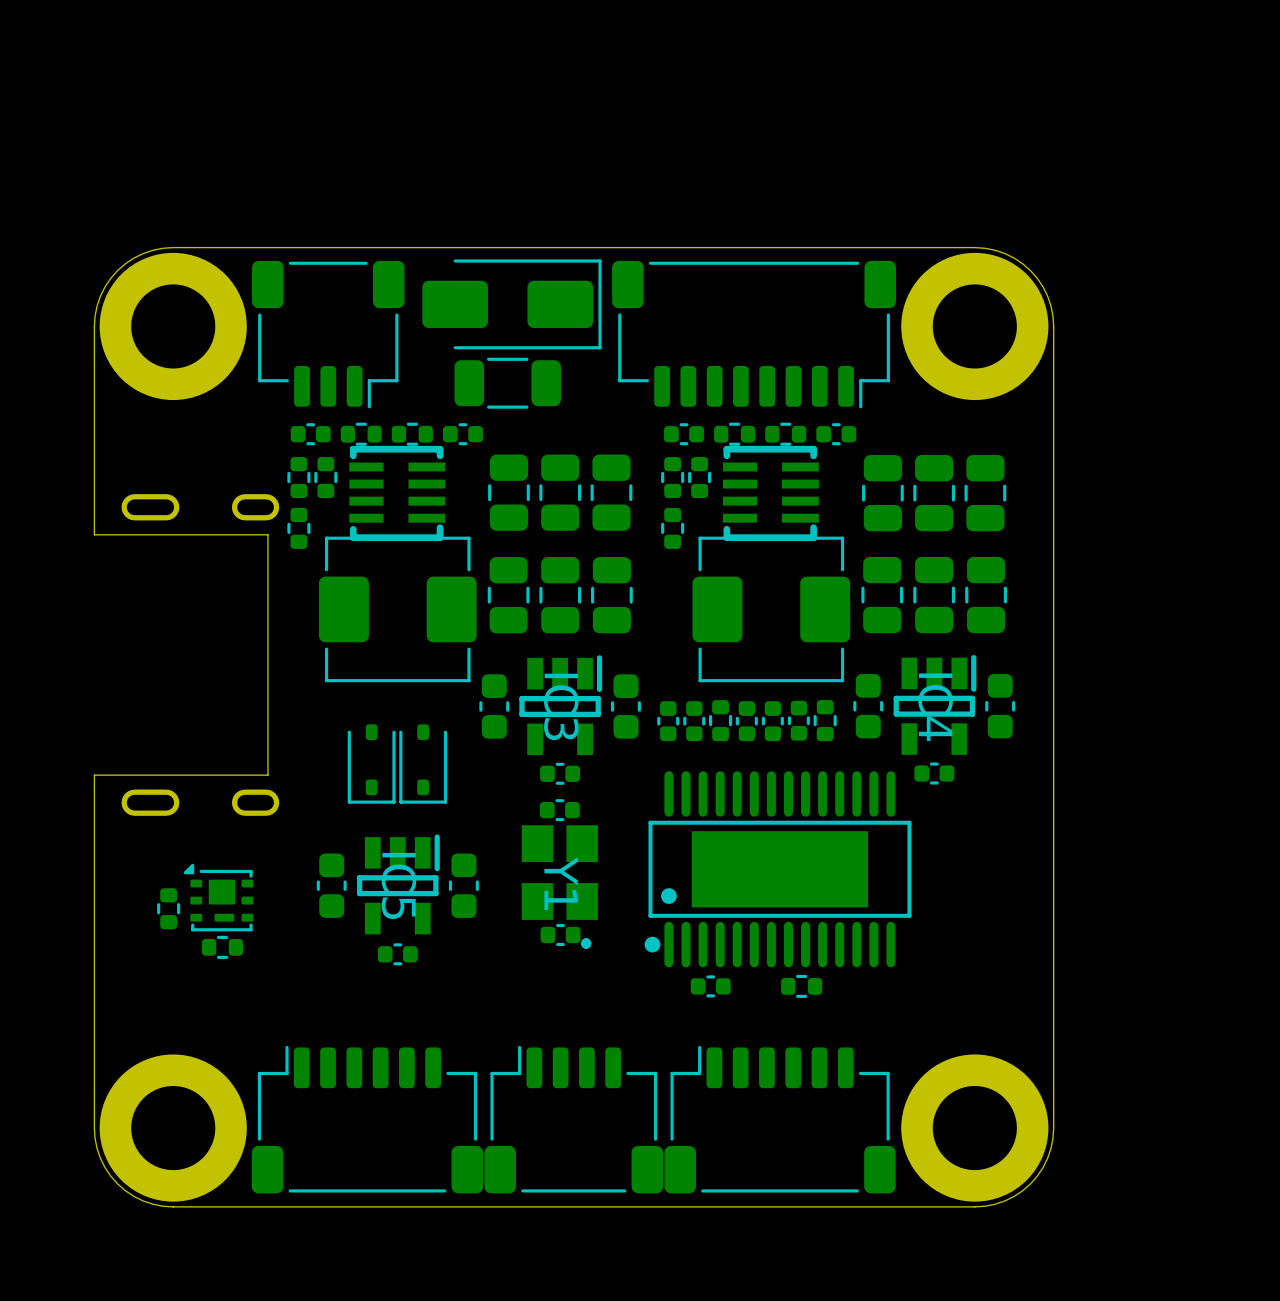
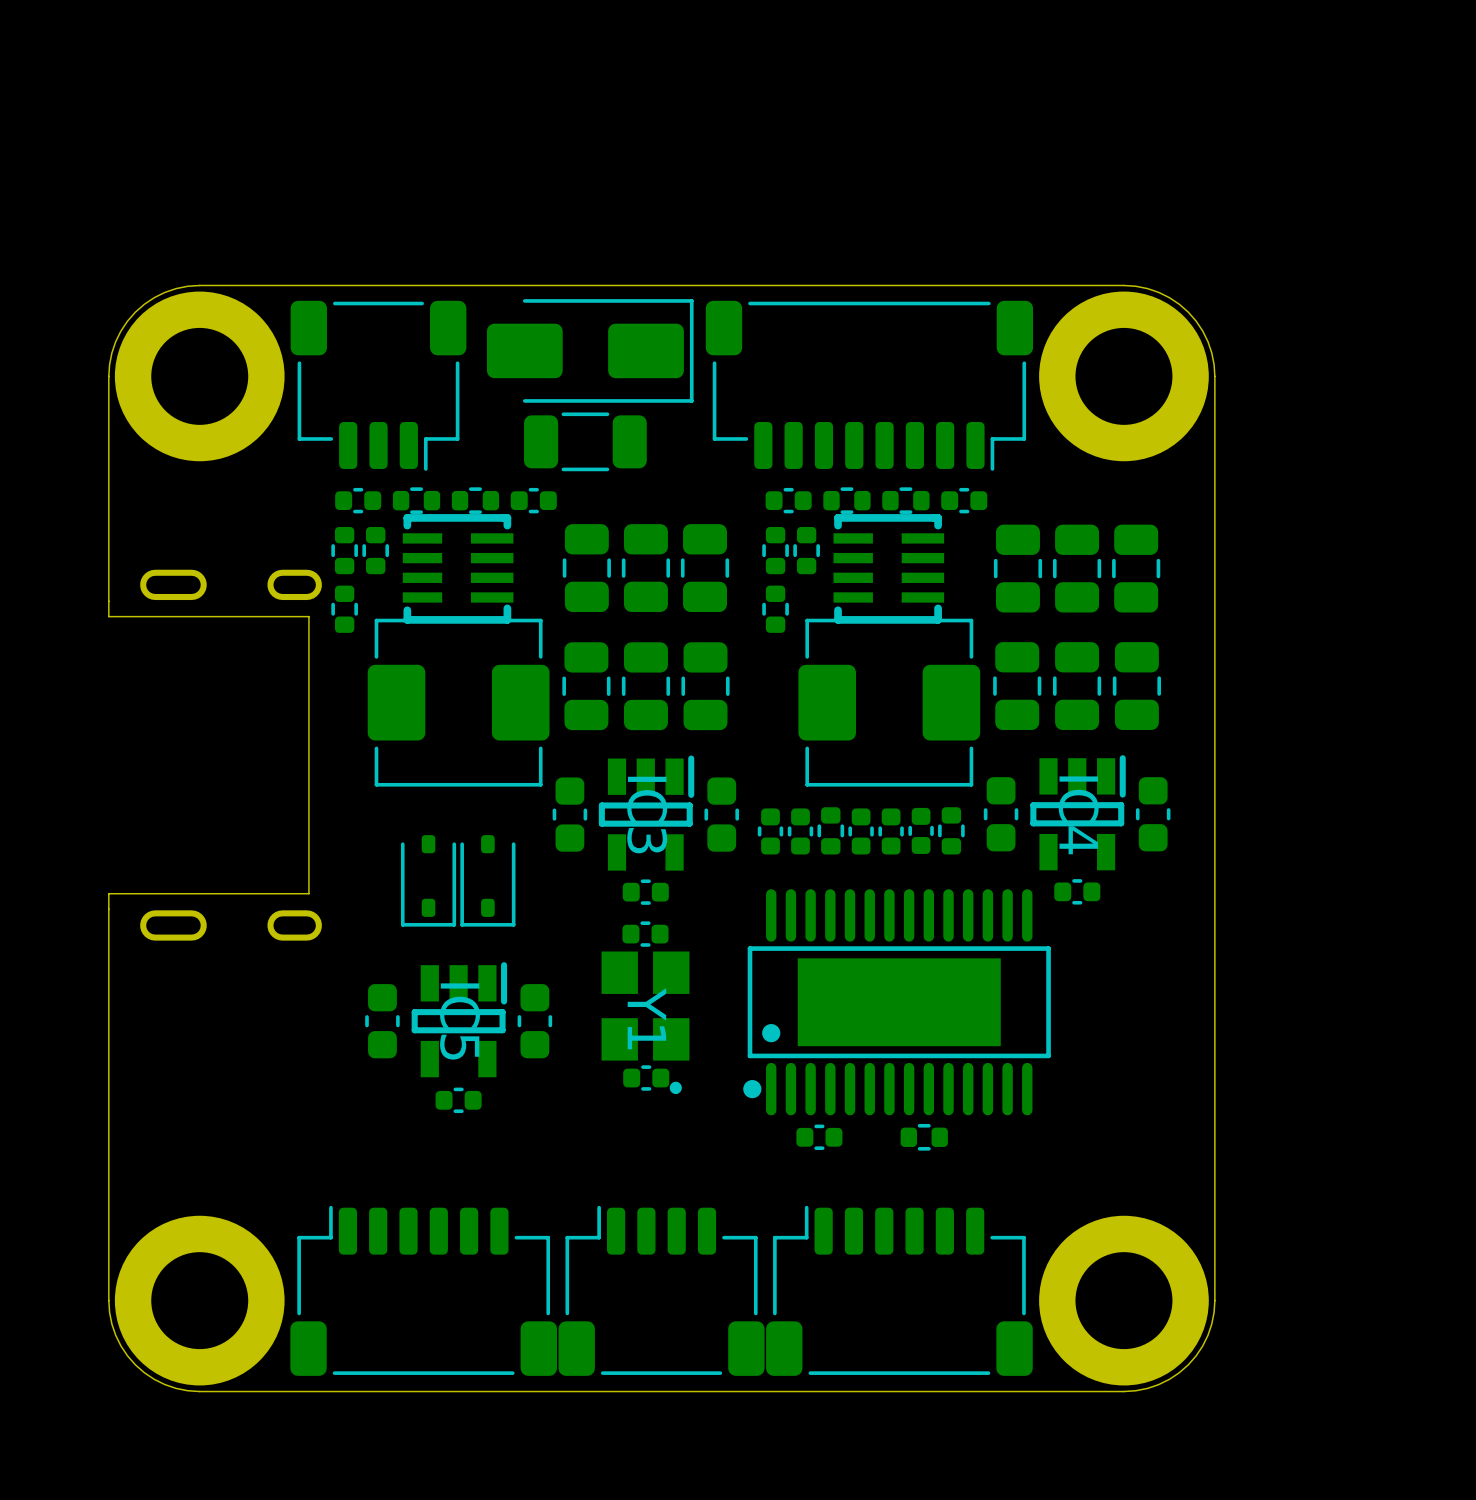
part: (218, 897) -> none
part: (168, 908) -> none
part: (222, 947) -> none

